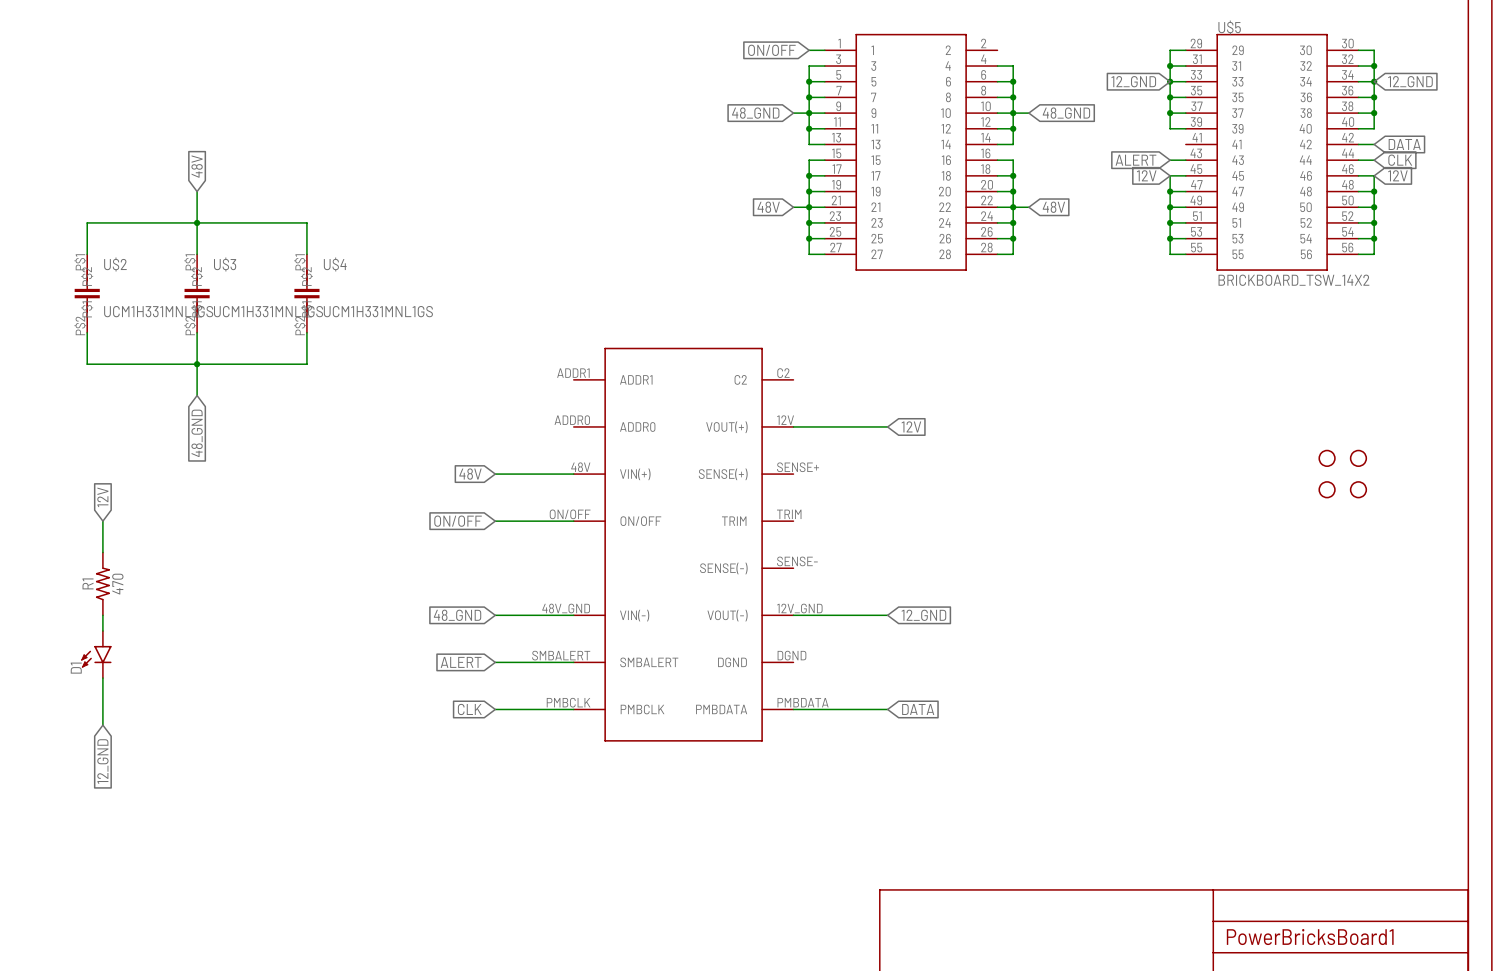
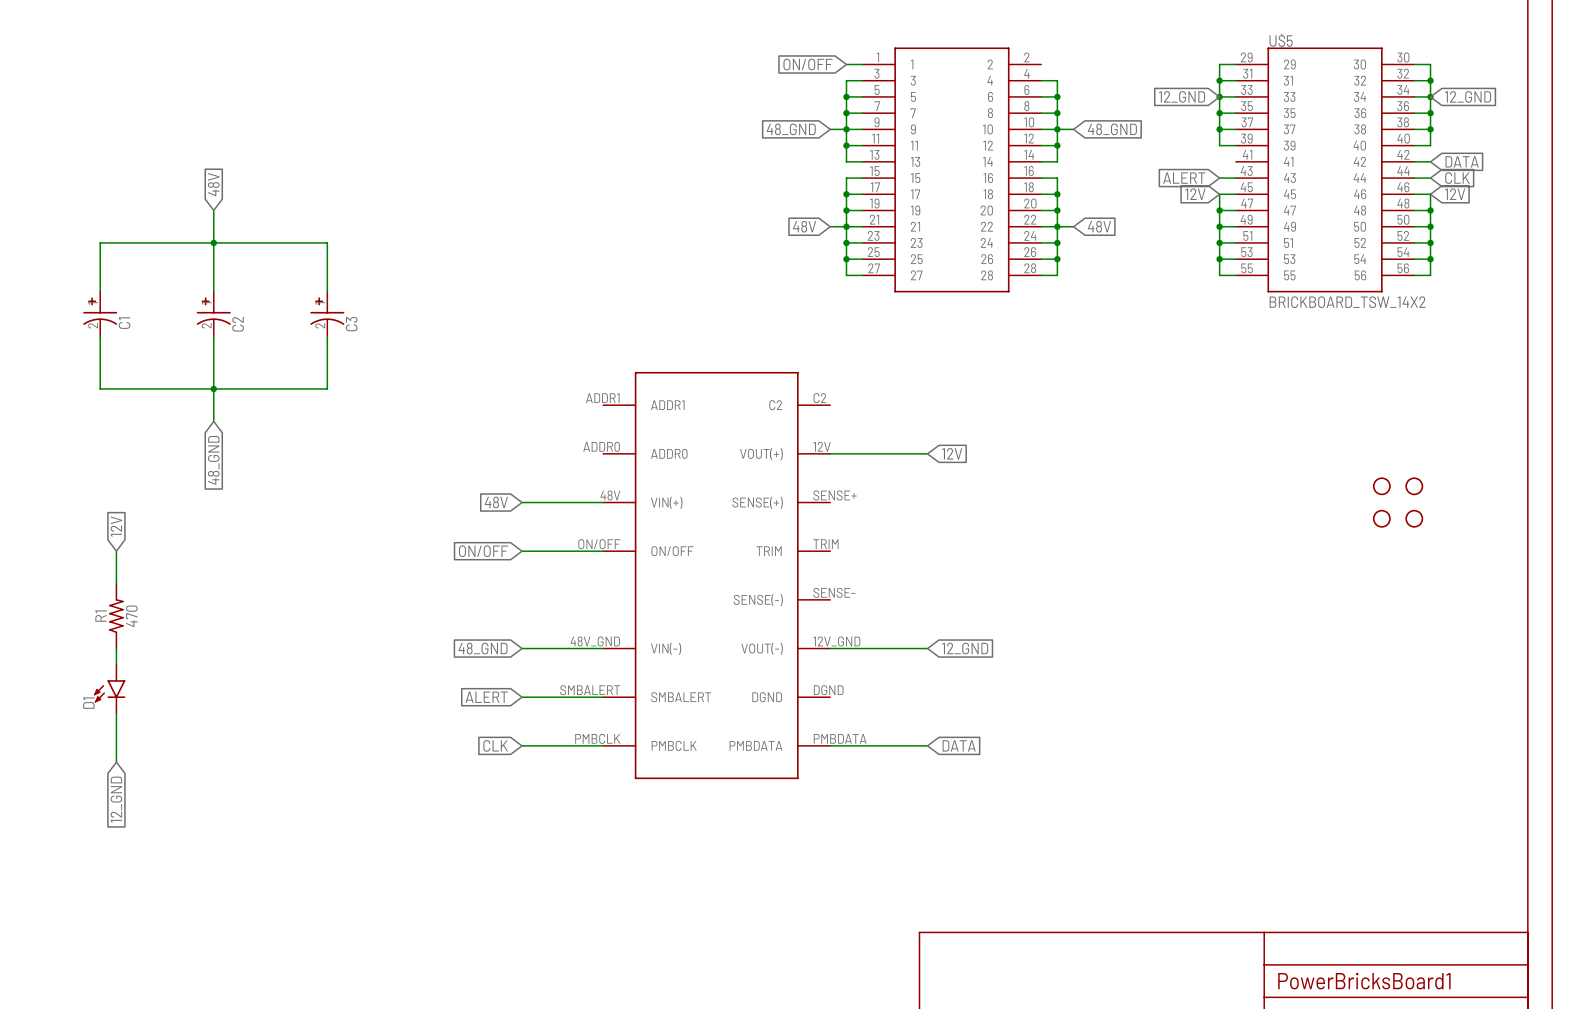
C1: none -> (100, 313)
C2: none -> (213, 313)
C3: none -> (327, 313)
U$2: UCM1H331MNL1GS (87, 293) -> none
U$3: UCM1H331MNL1GS (197, 293) -> none
U$4: UCM1H331MNL1GS (306, 293) -> none

